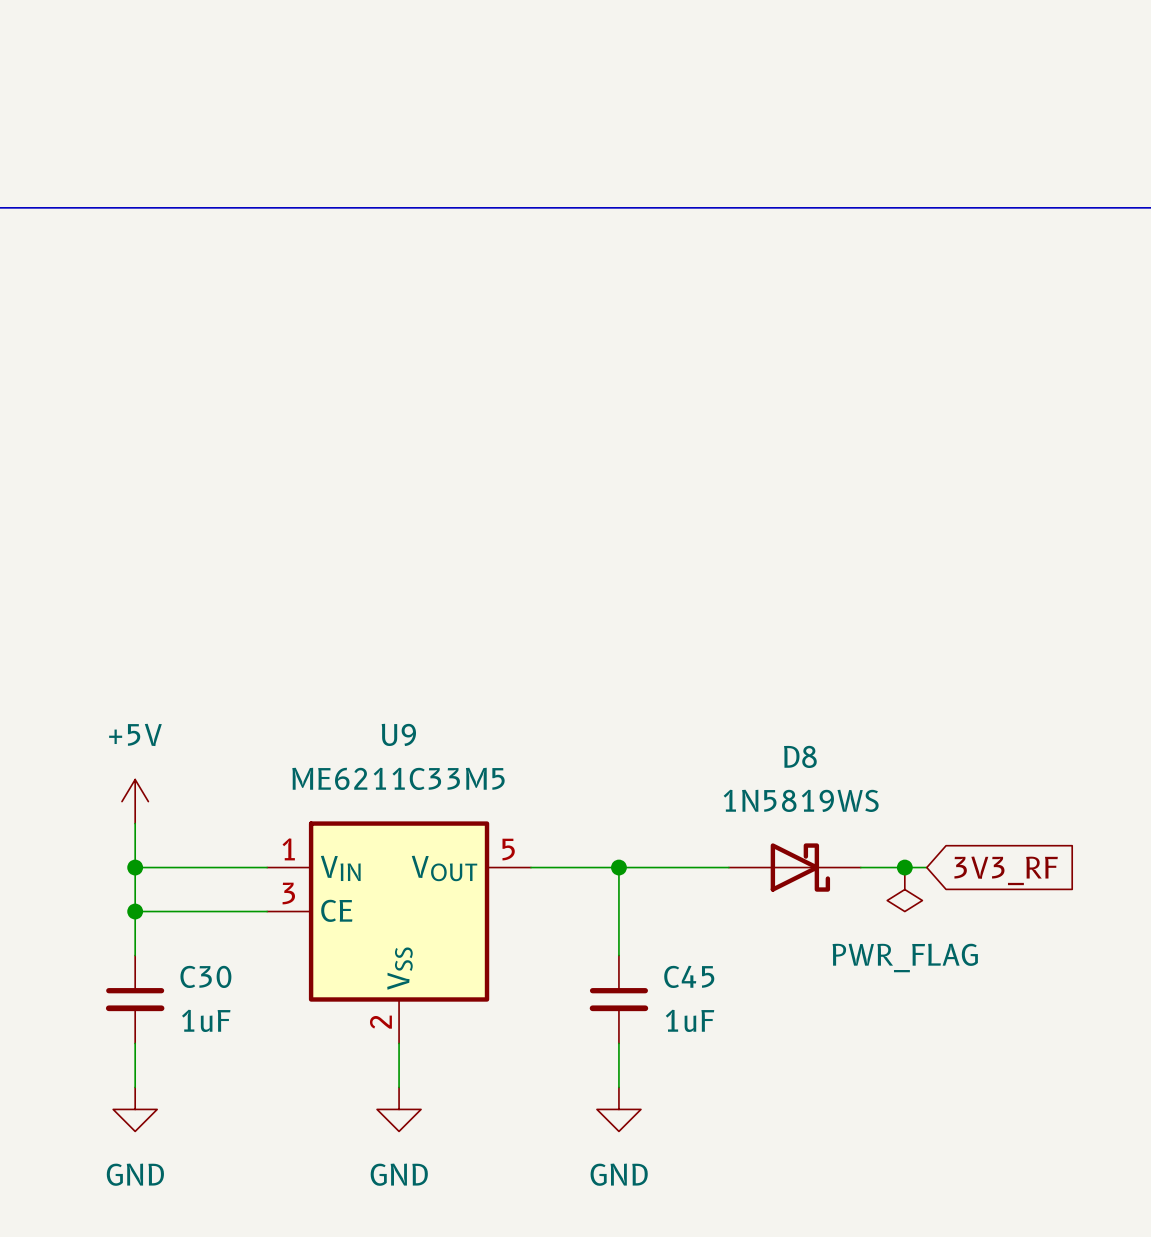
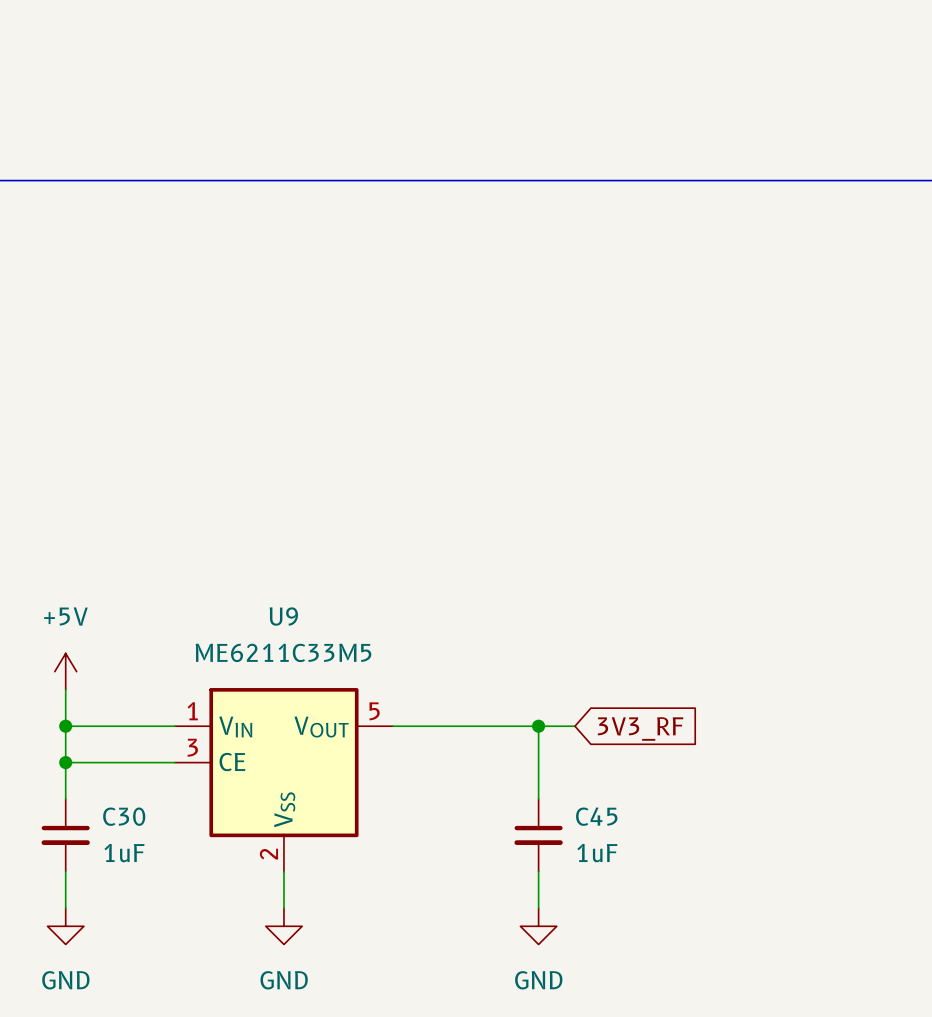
wire: (618, 867) (618, 955) -> (538, 726) (538, 798)
junction position: (618, 867) -> (538, 726)
D8: 1N5819WS (794, 867) -> none
wire: (860, 867) (926, 867) -> none
junction: (904, 867) -> none
global label position: 3V3_RF (1006, 870) -> 3V3_RF (640, 728)
power symbol: PWR_FLAG (904, 889) -> none
C45 position: (618, 999) -> (538, 835)
wire: (618, 1043) (618, 1087) -> (538, 871) (538, 908)
power symbol position: GND (618, 1109) -> GND (538, 926)

